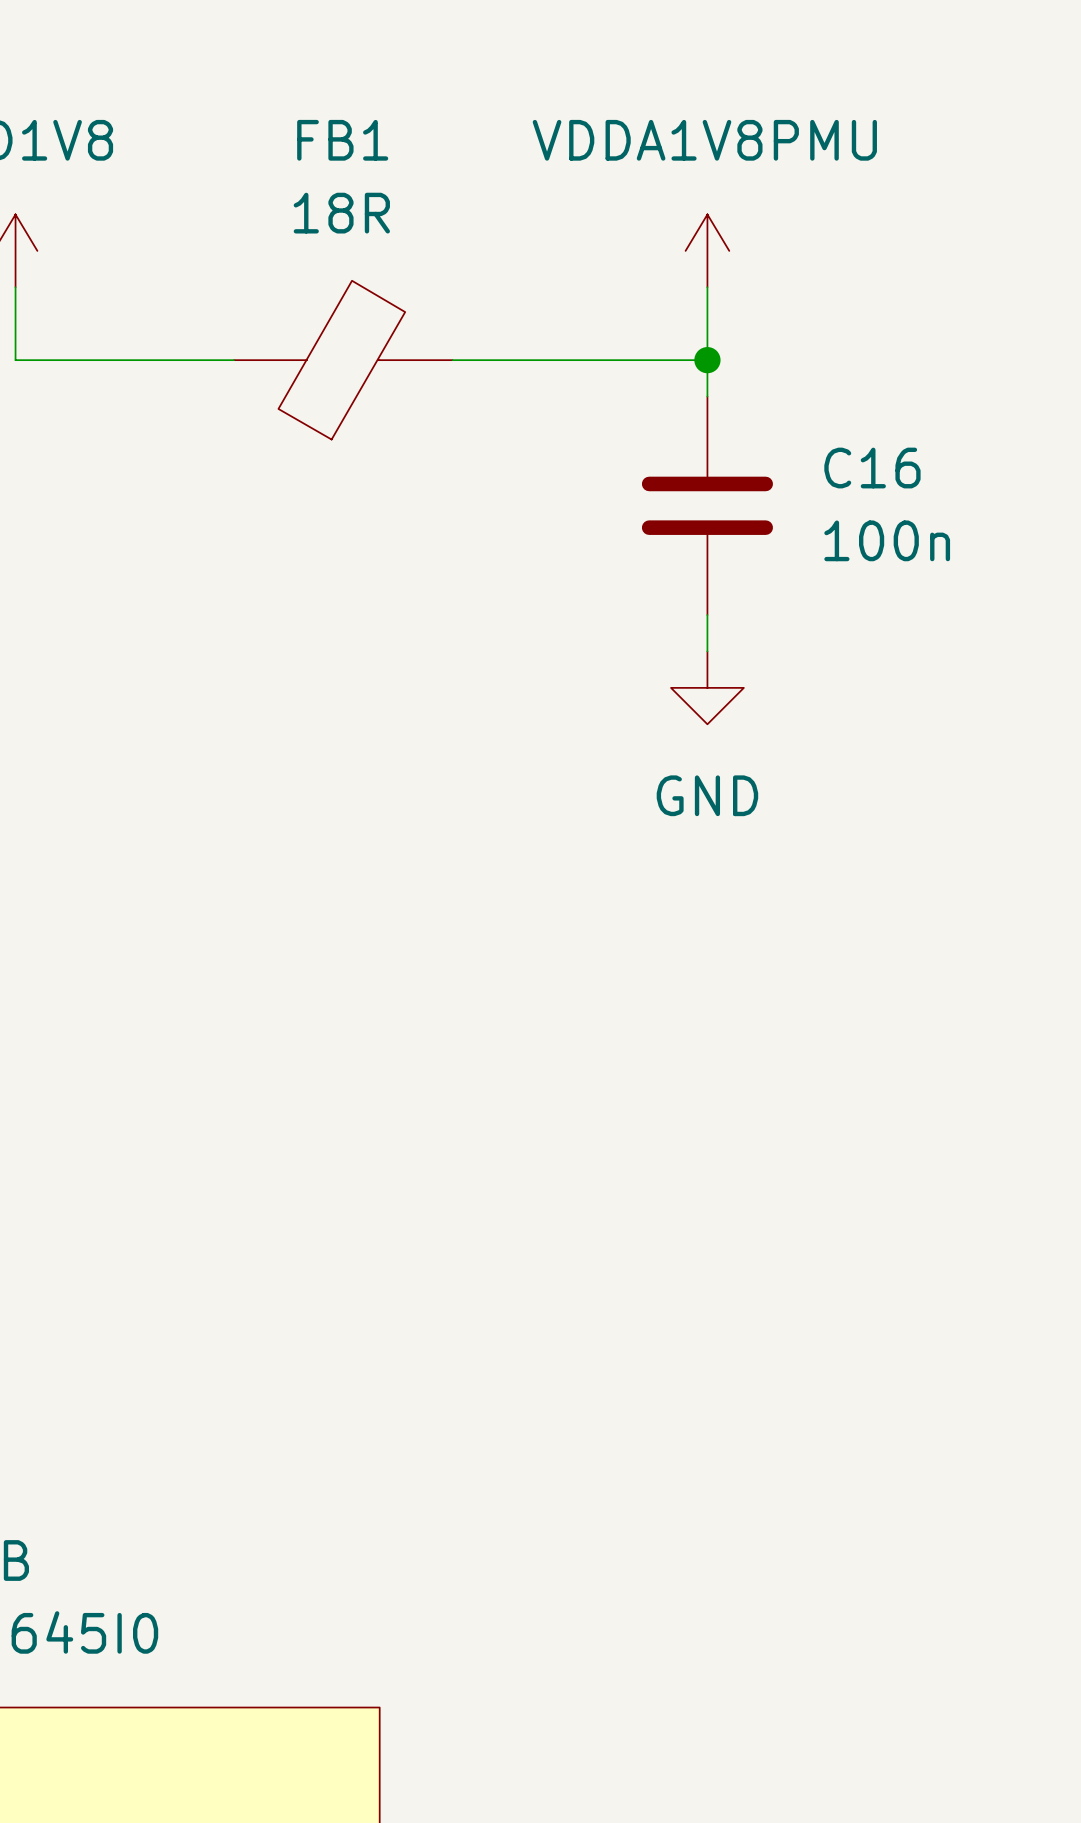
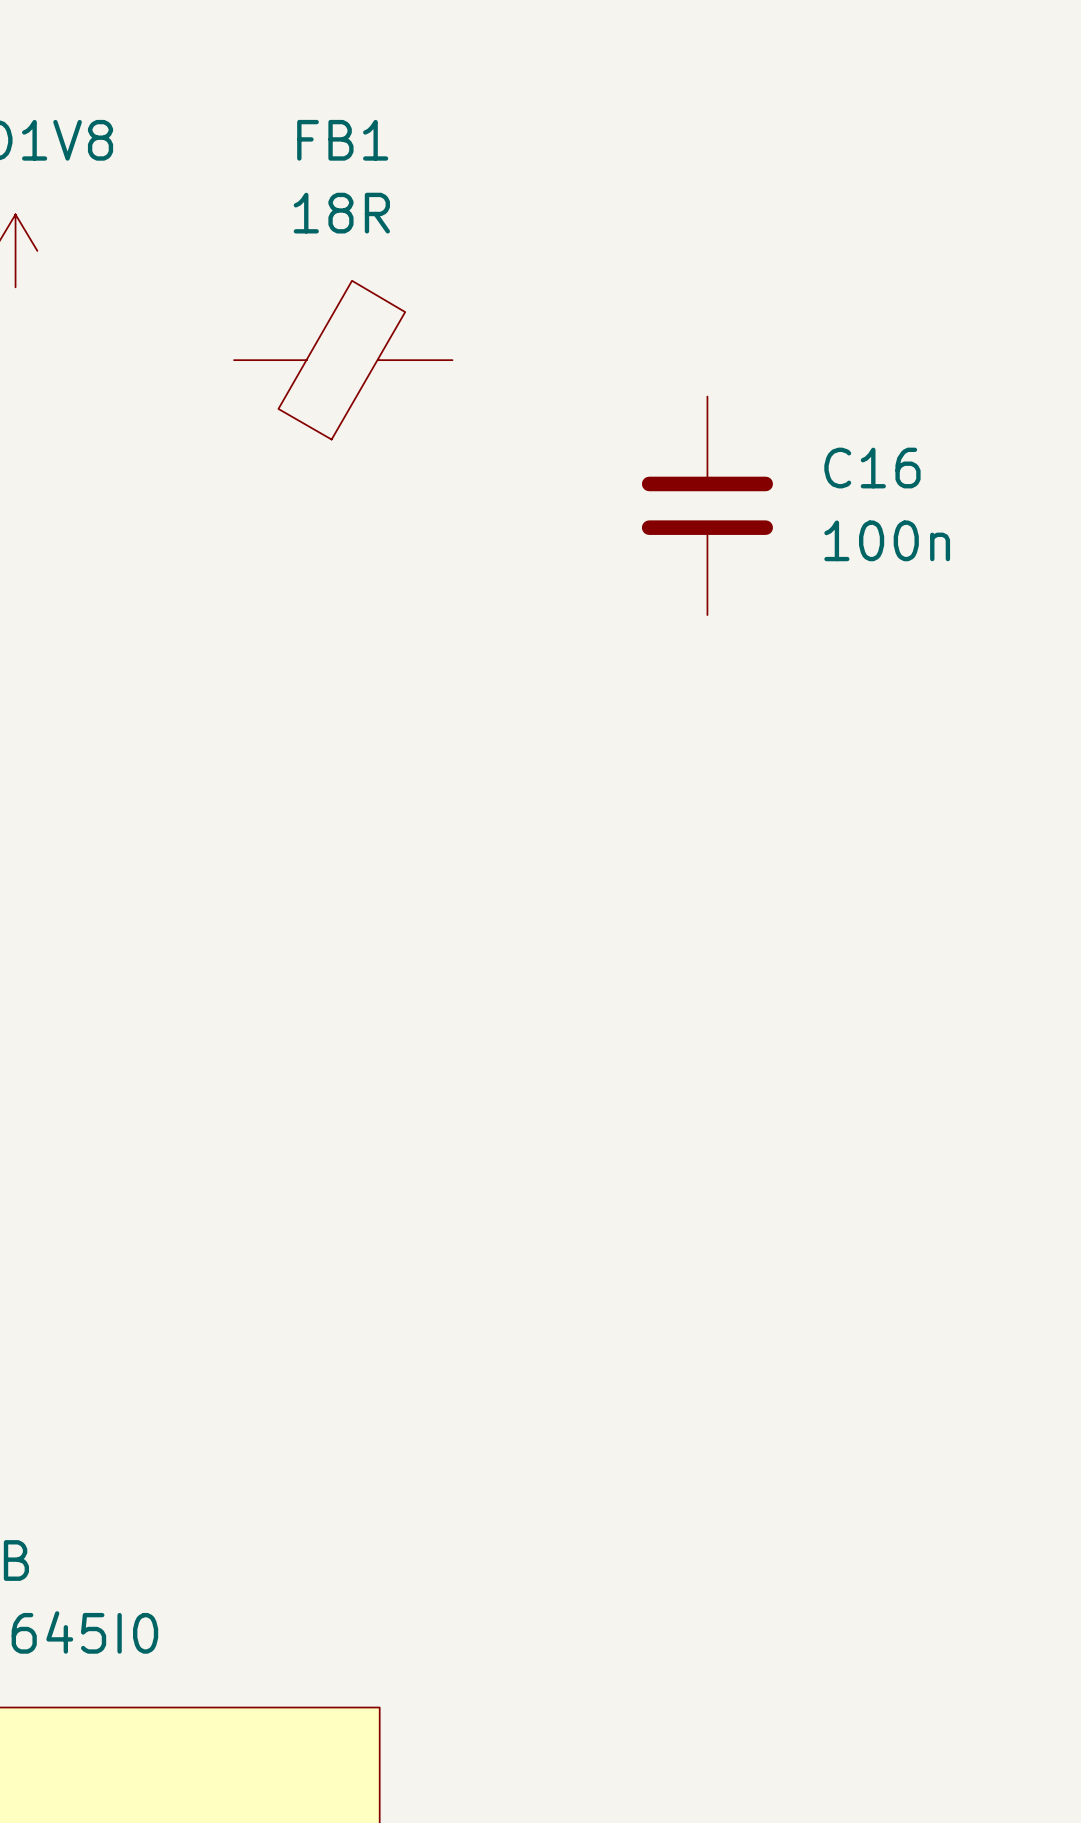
power symbol: VDDA1V8PMU (707, 250) -> none
wire: (15, 287) (15, 360) (234, 360) -> none
wire: (707, 287) (707, 396) -> none
wire: (452, 360) (707, 360) -> none
junction: (707, 360) -> none
wire: (707, 615) (707, 651) -> none
power symbol: GND (707, 687) -> none

